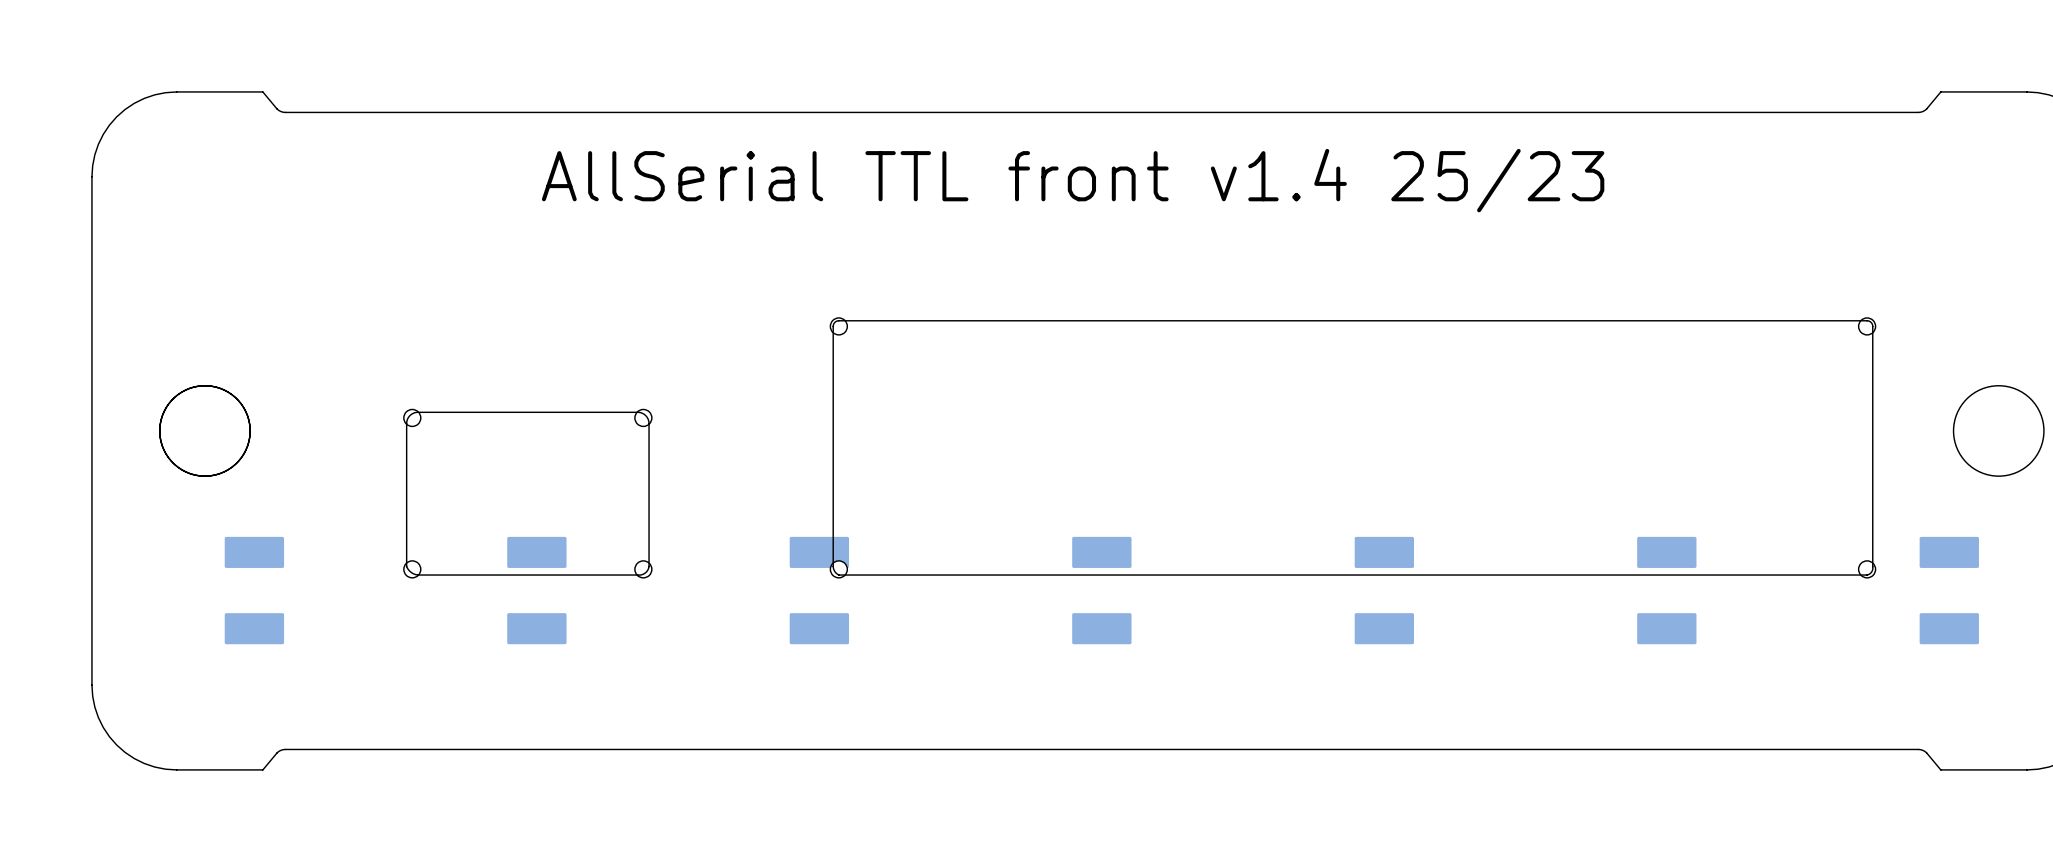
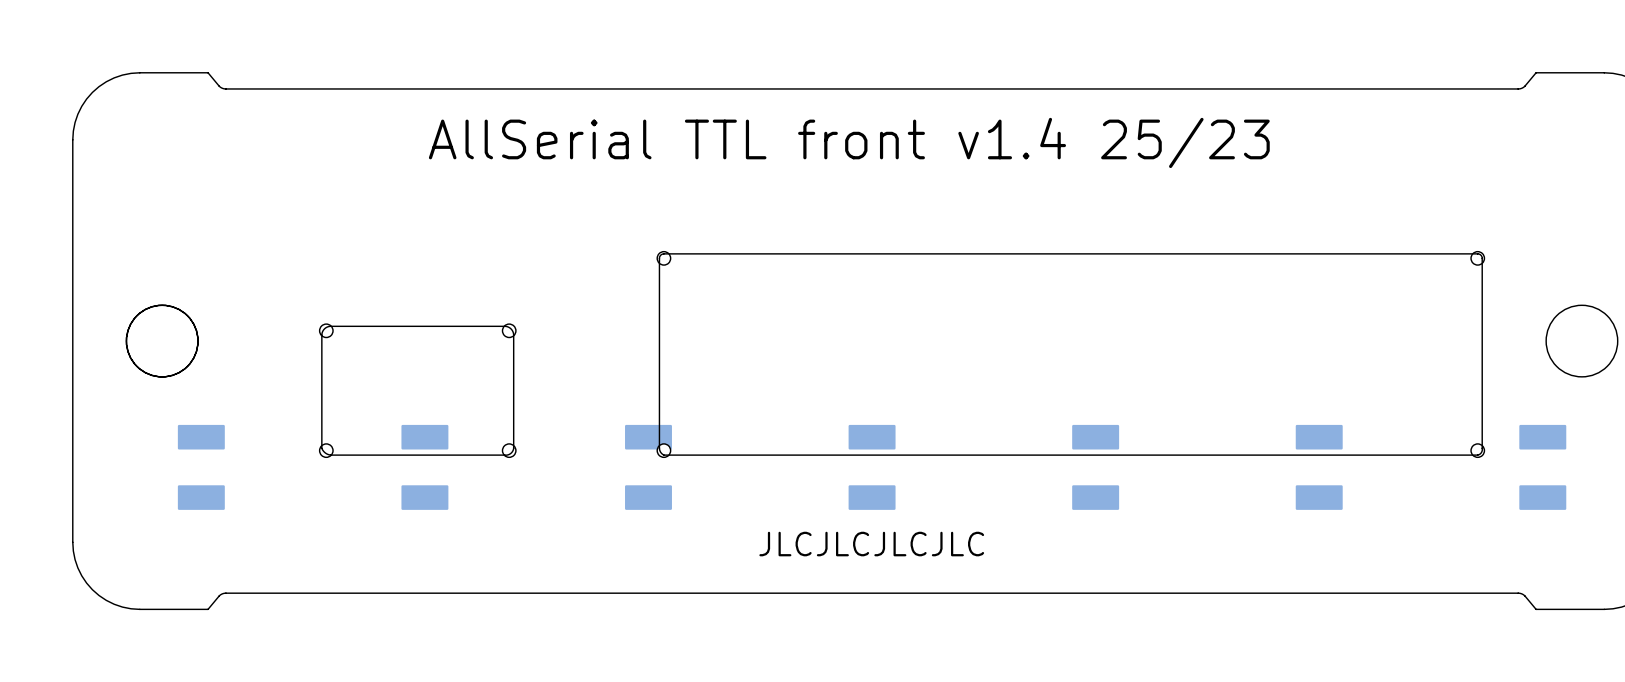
text: none -> JLCJLCJLCJLC (871, 544)

